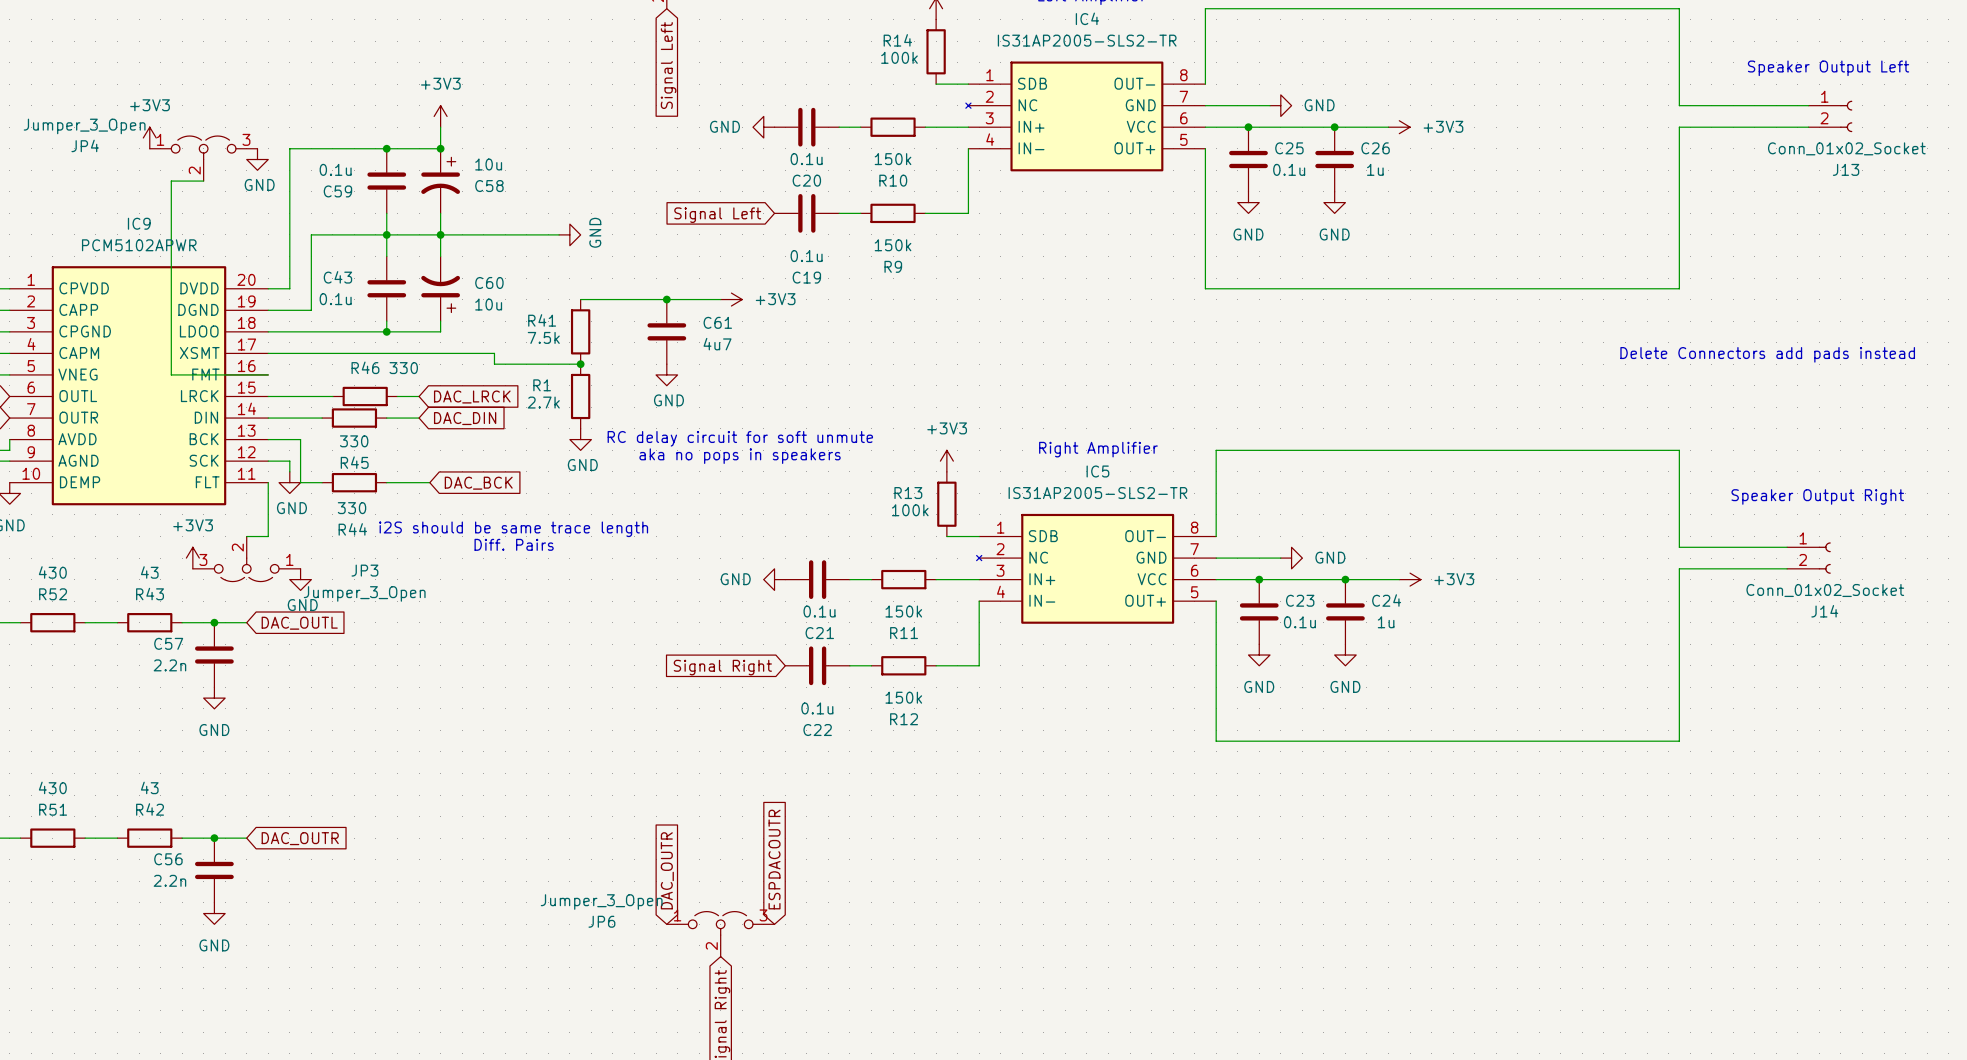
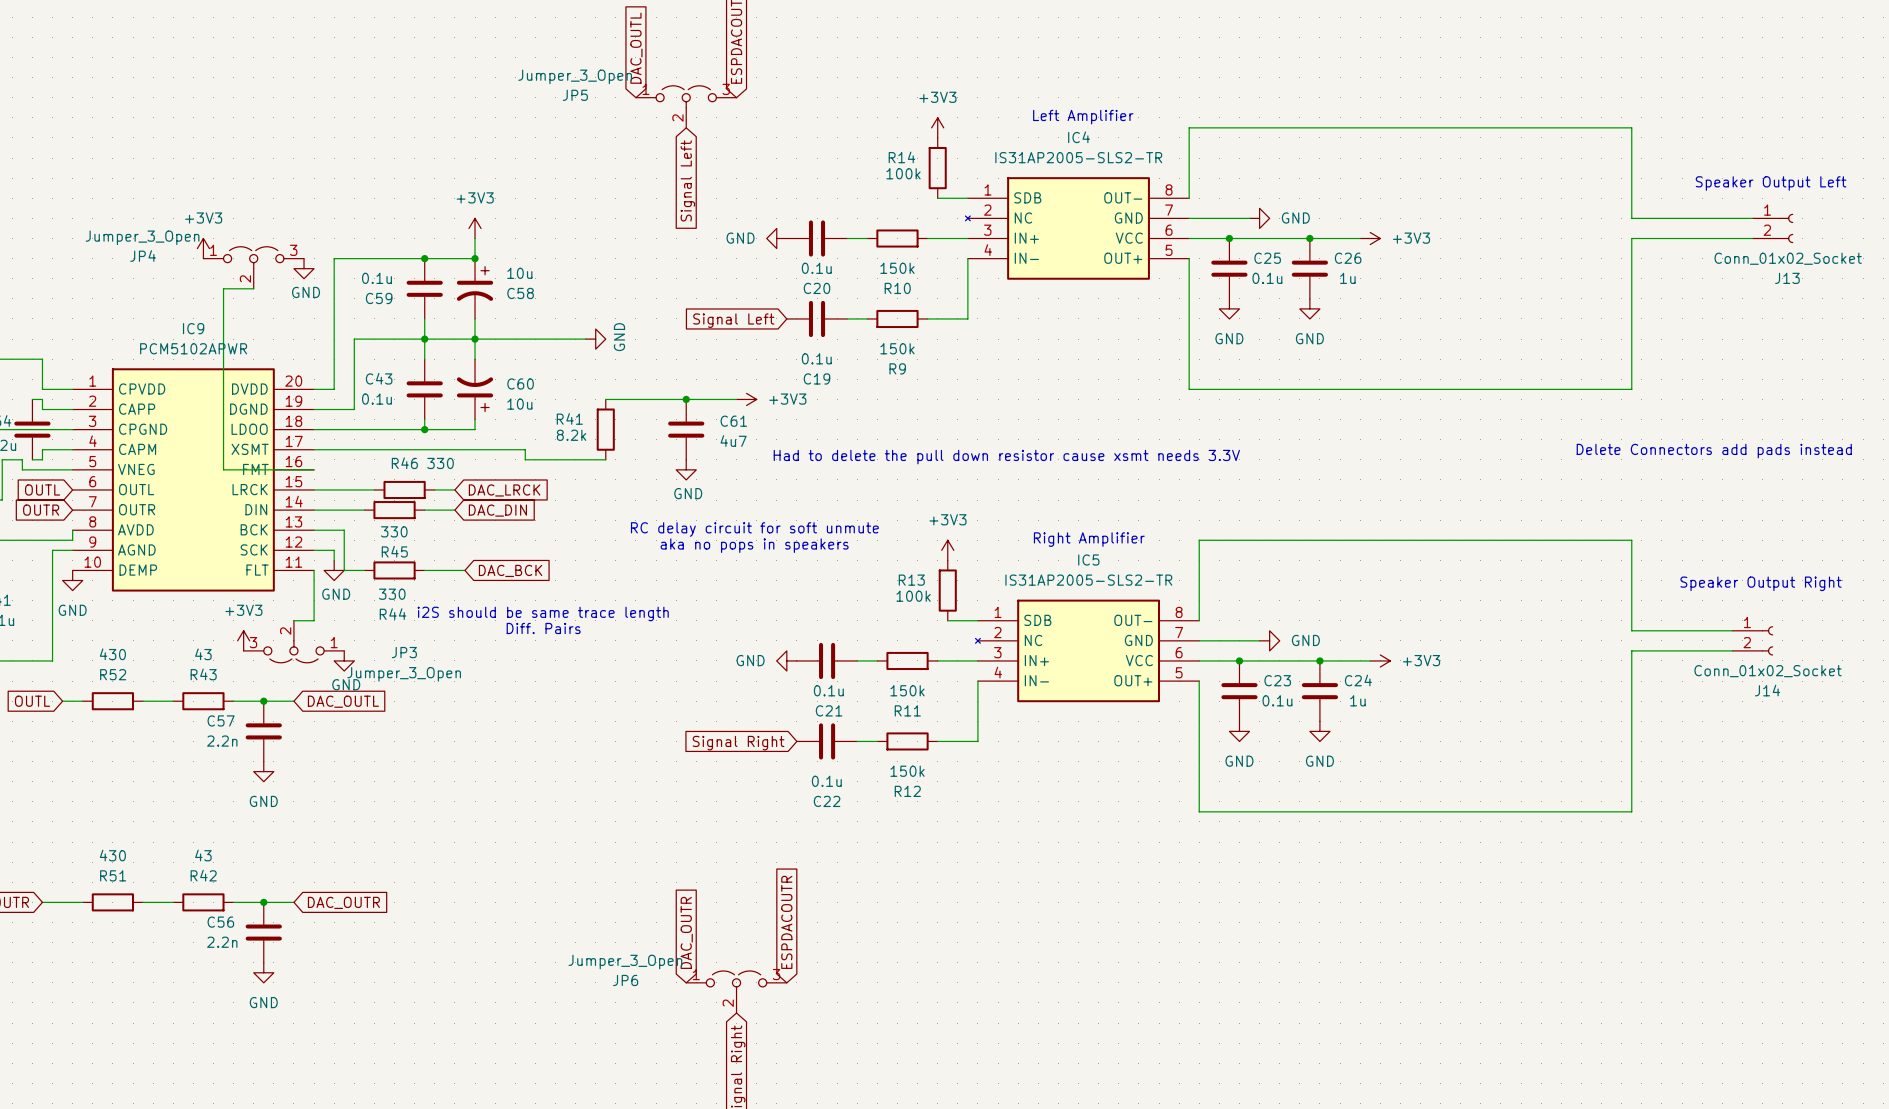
R41 value: 7.5k (543, 337) -> 8.2k (571, 435)
text: none -> Had to delete the pull down resistor cause xsmt needs 3.3V (1006, 457)
junction: (580, 364) -> none
R1: 2.7k (580, 396) -> none
power symbol: GND (580, 439) -> none

